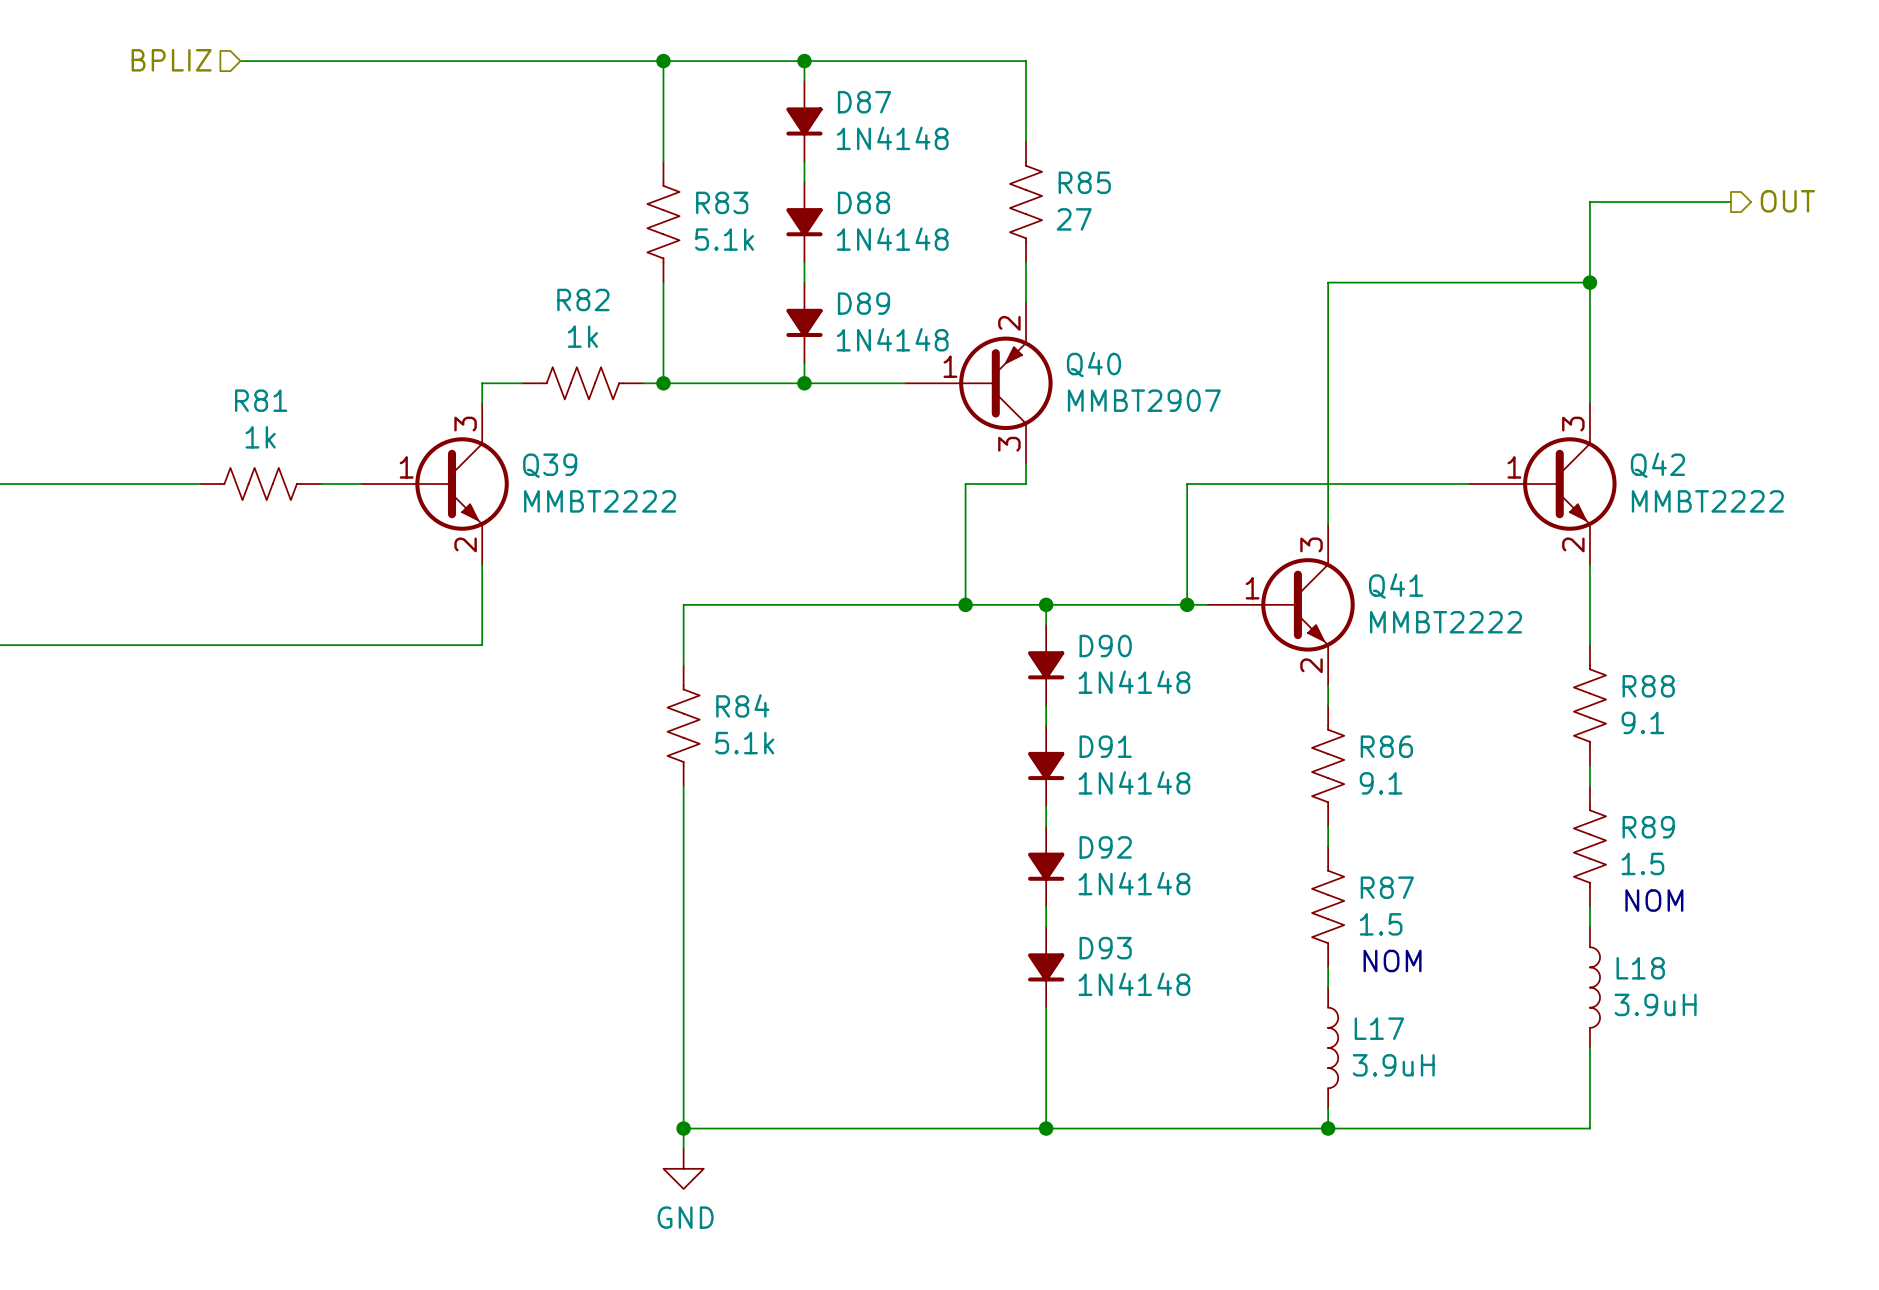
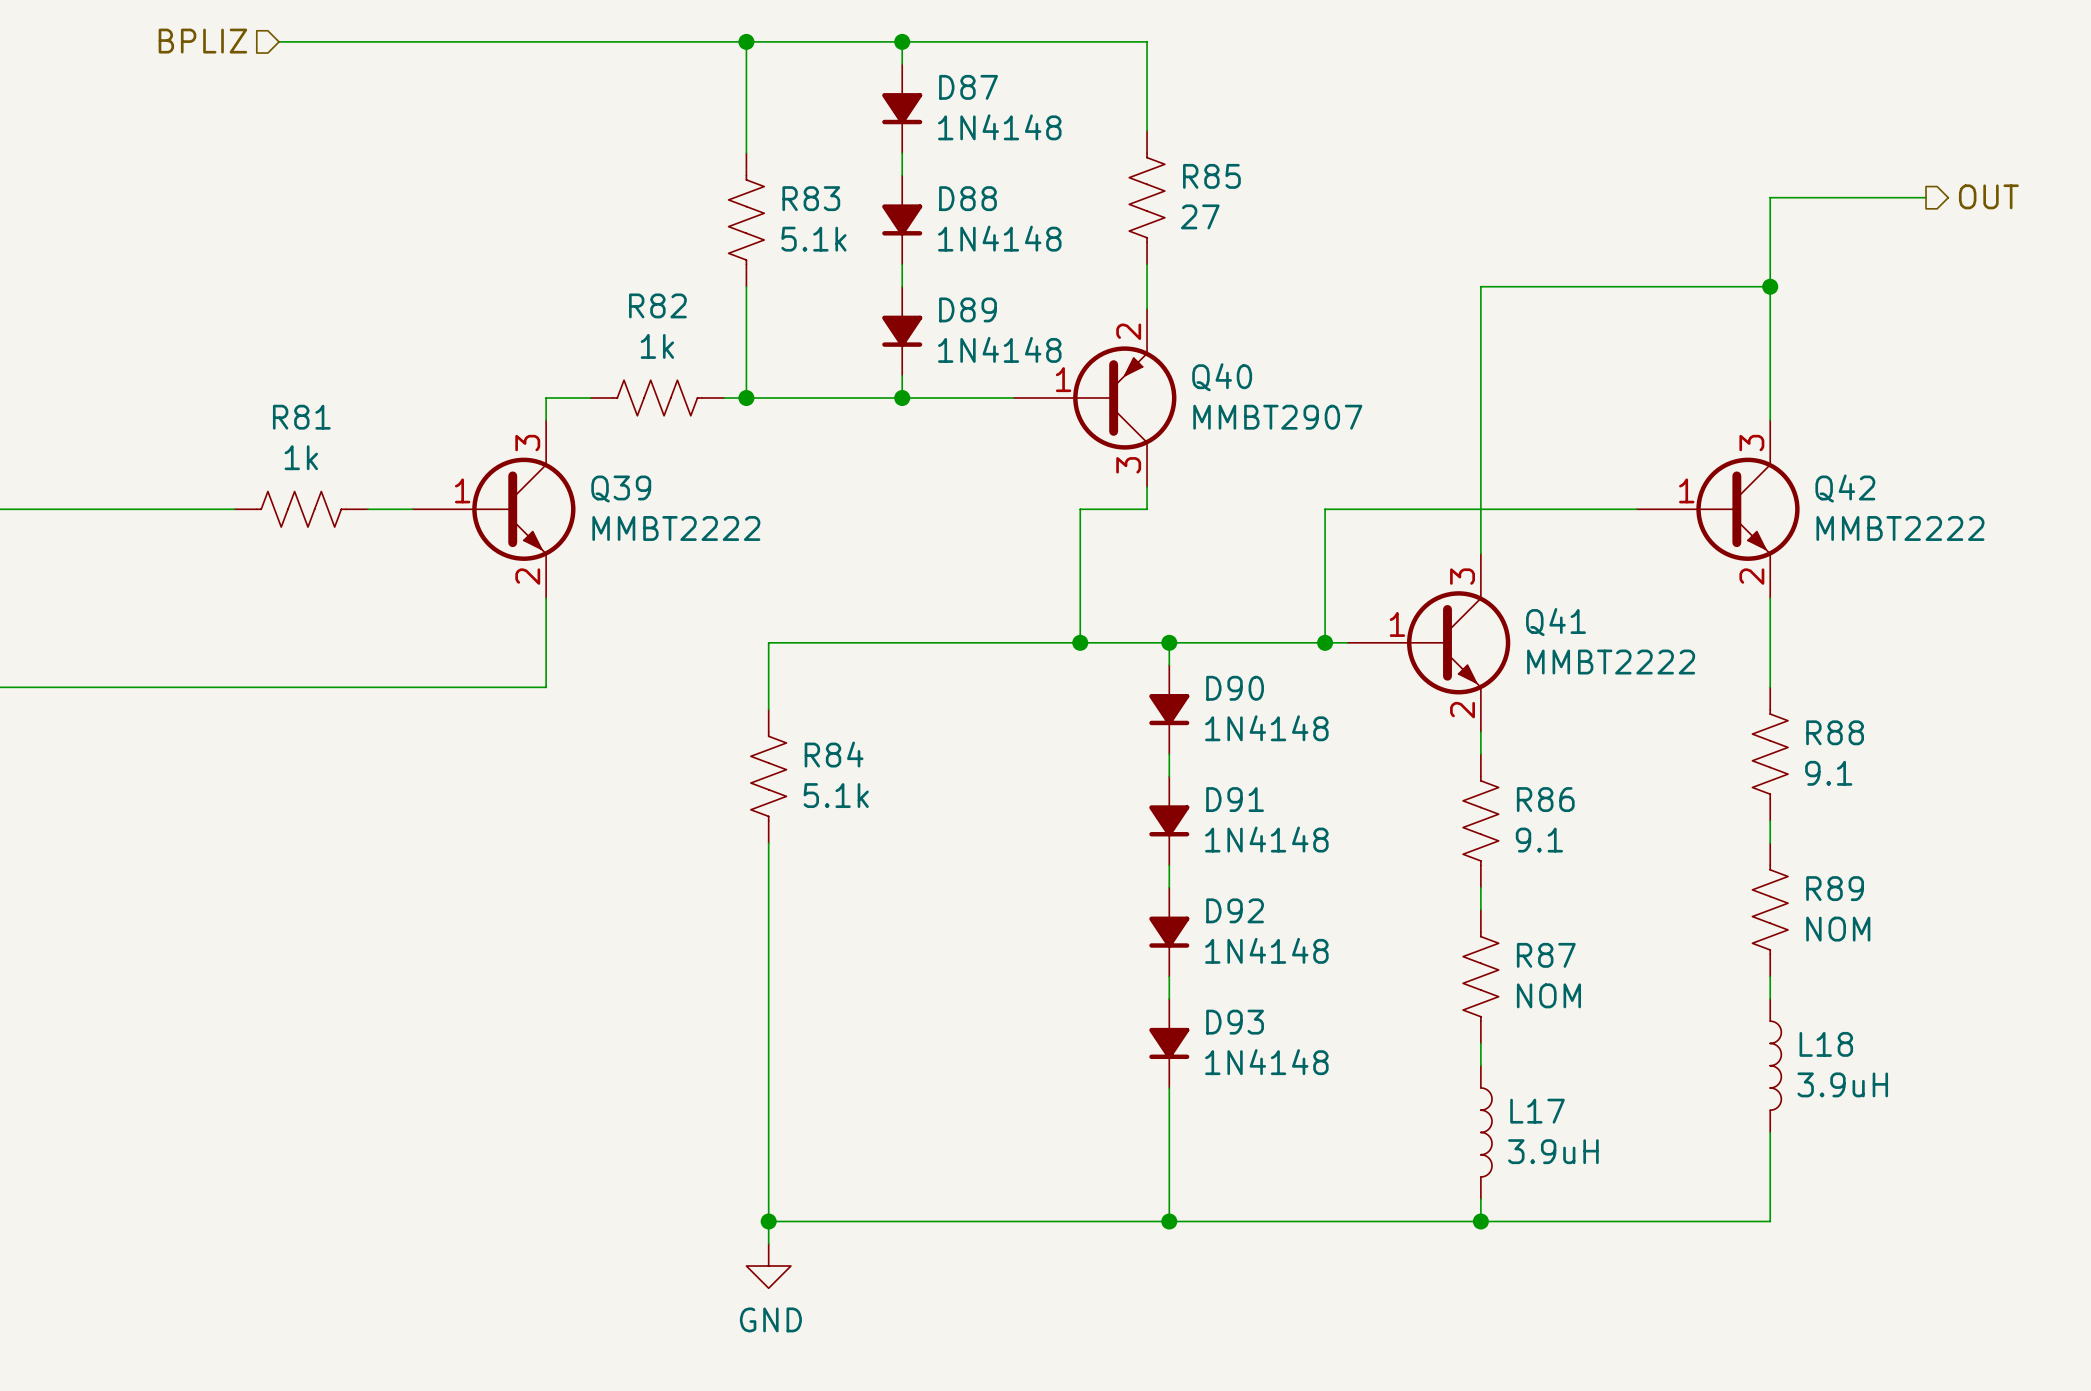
R89 value: 1.5 (1642, 863) -> NOM (1838, 929)
text: NOM (1654, 900) -> none
R87 value: 1.5 (1381, 924) -> NOM (1548, 995)
text: NOM (1392, 960) -> none

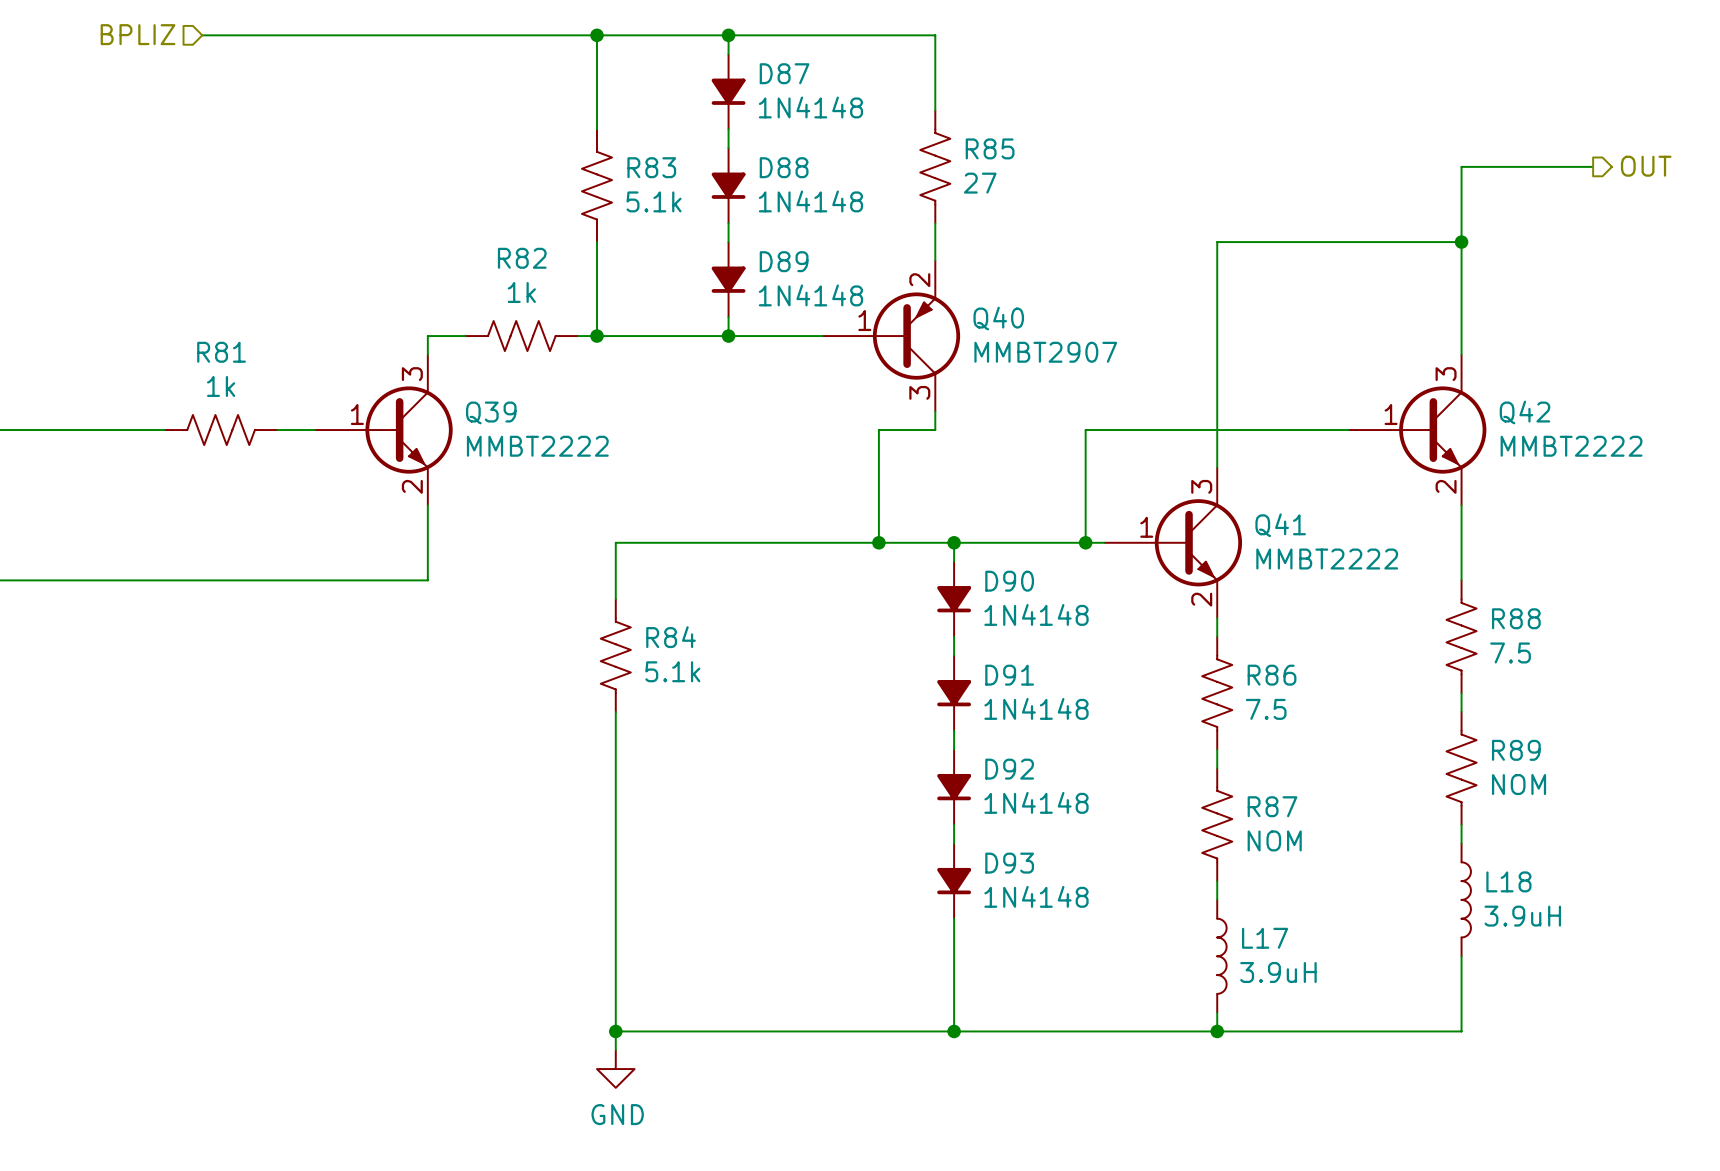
R88 value: 9.1 (1828, 773) -> 7.5 (1510, 652)
R86 value: 9.1 (1539, 840) -> 7.5 (1266, 709)

